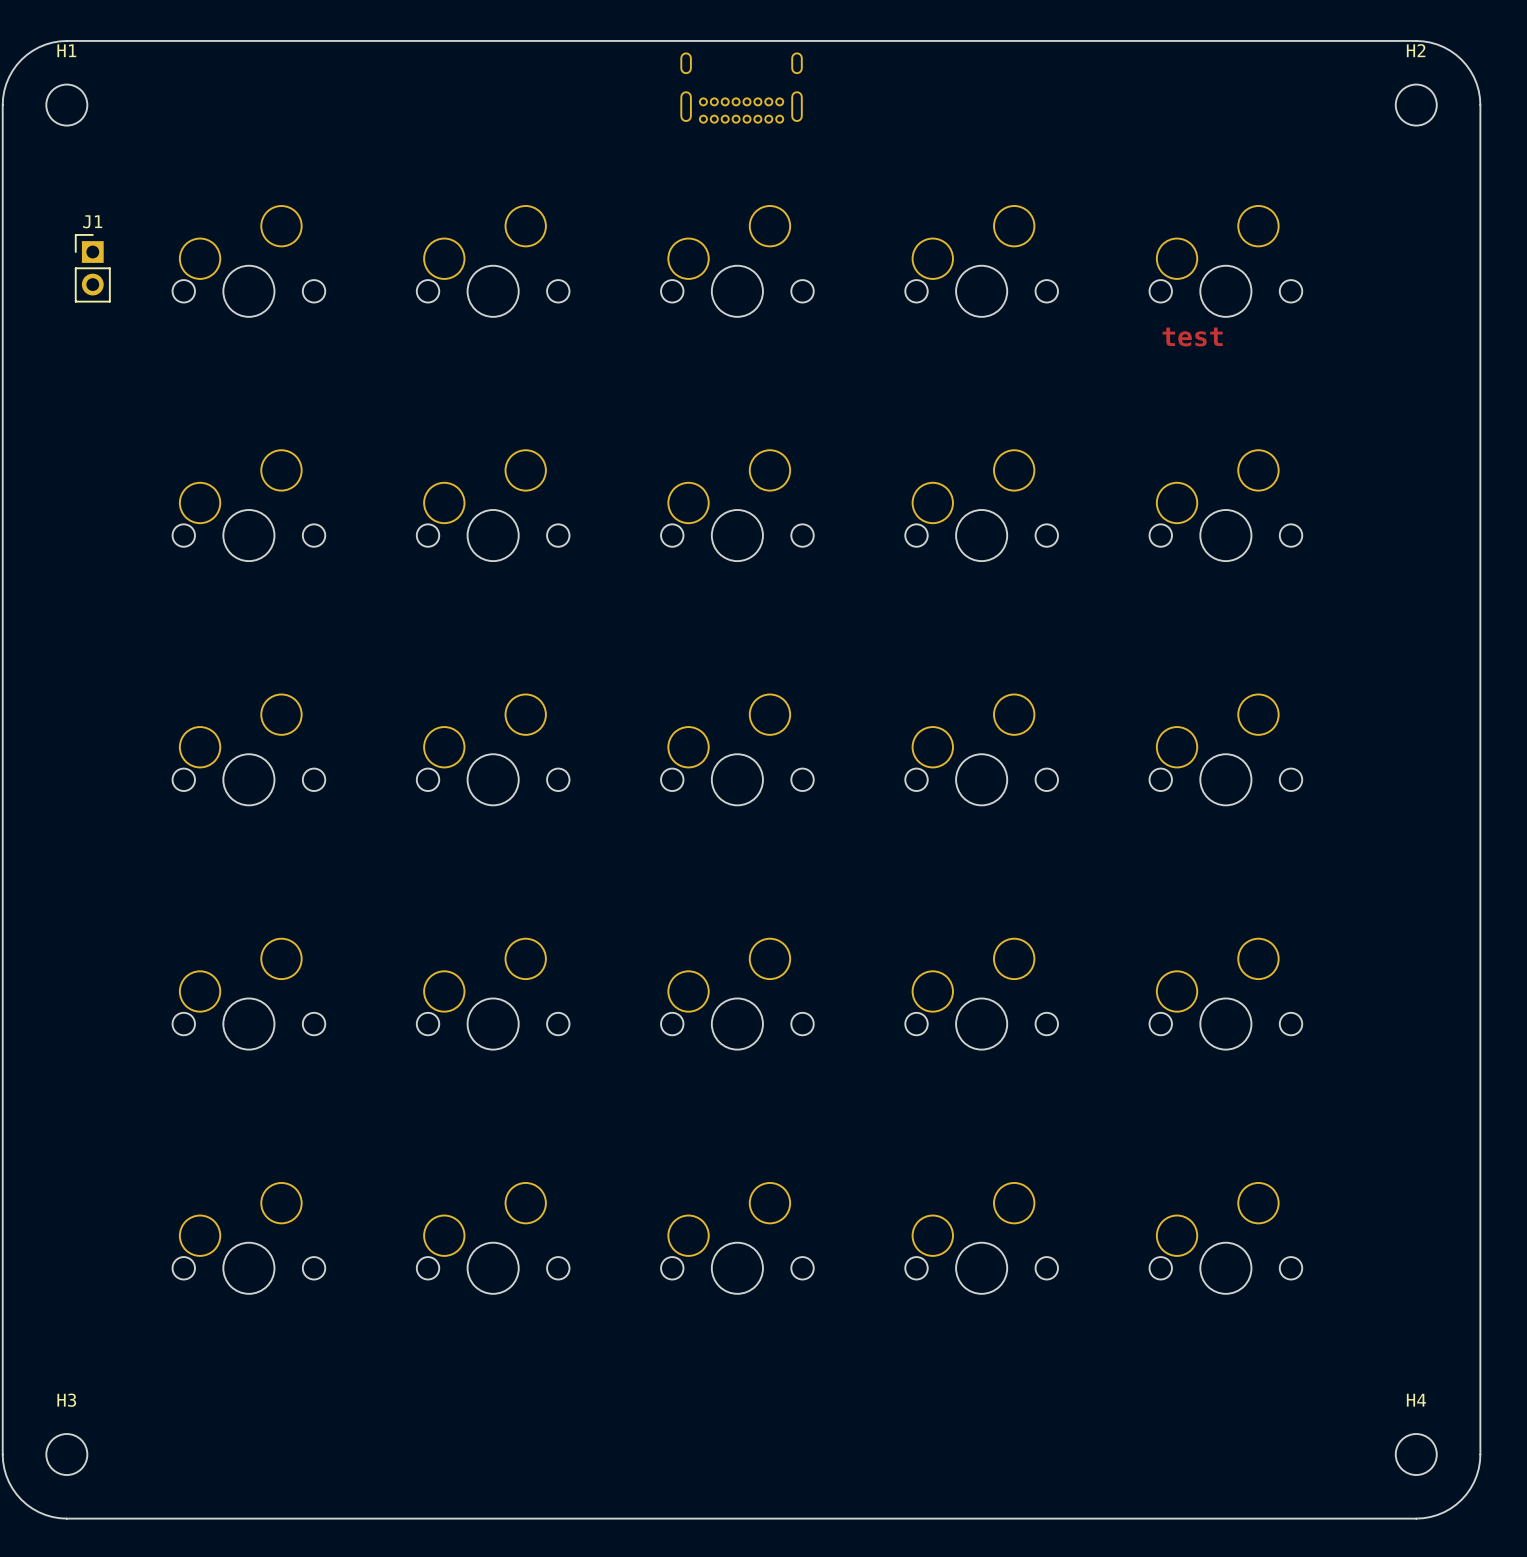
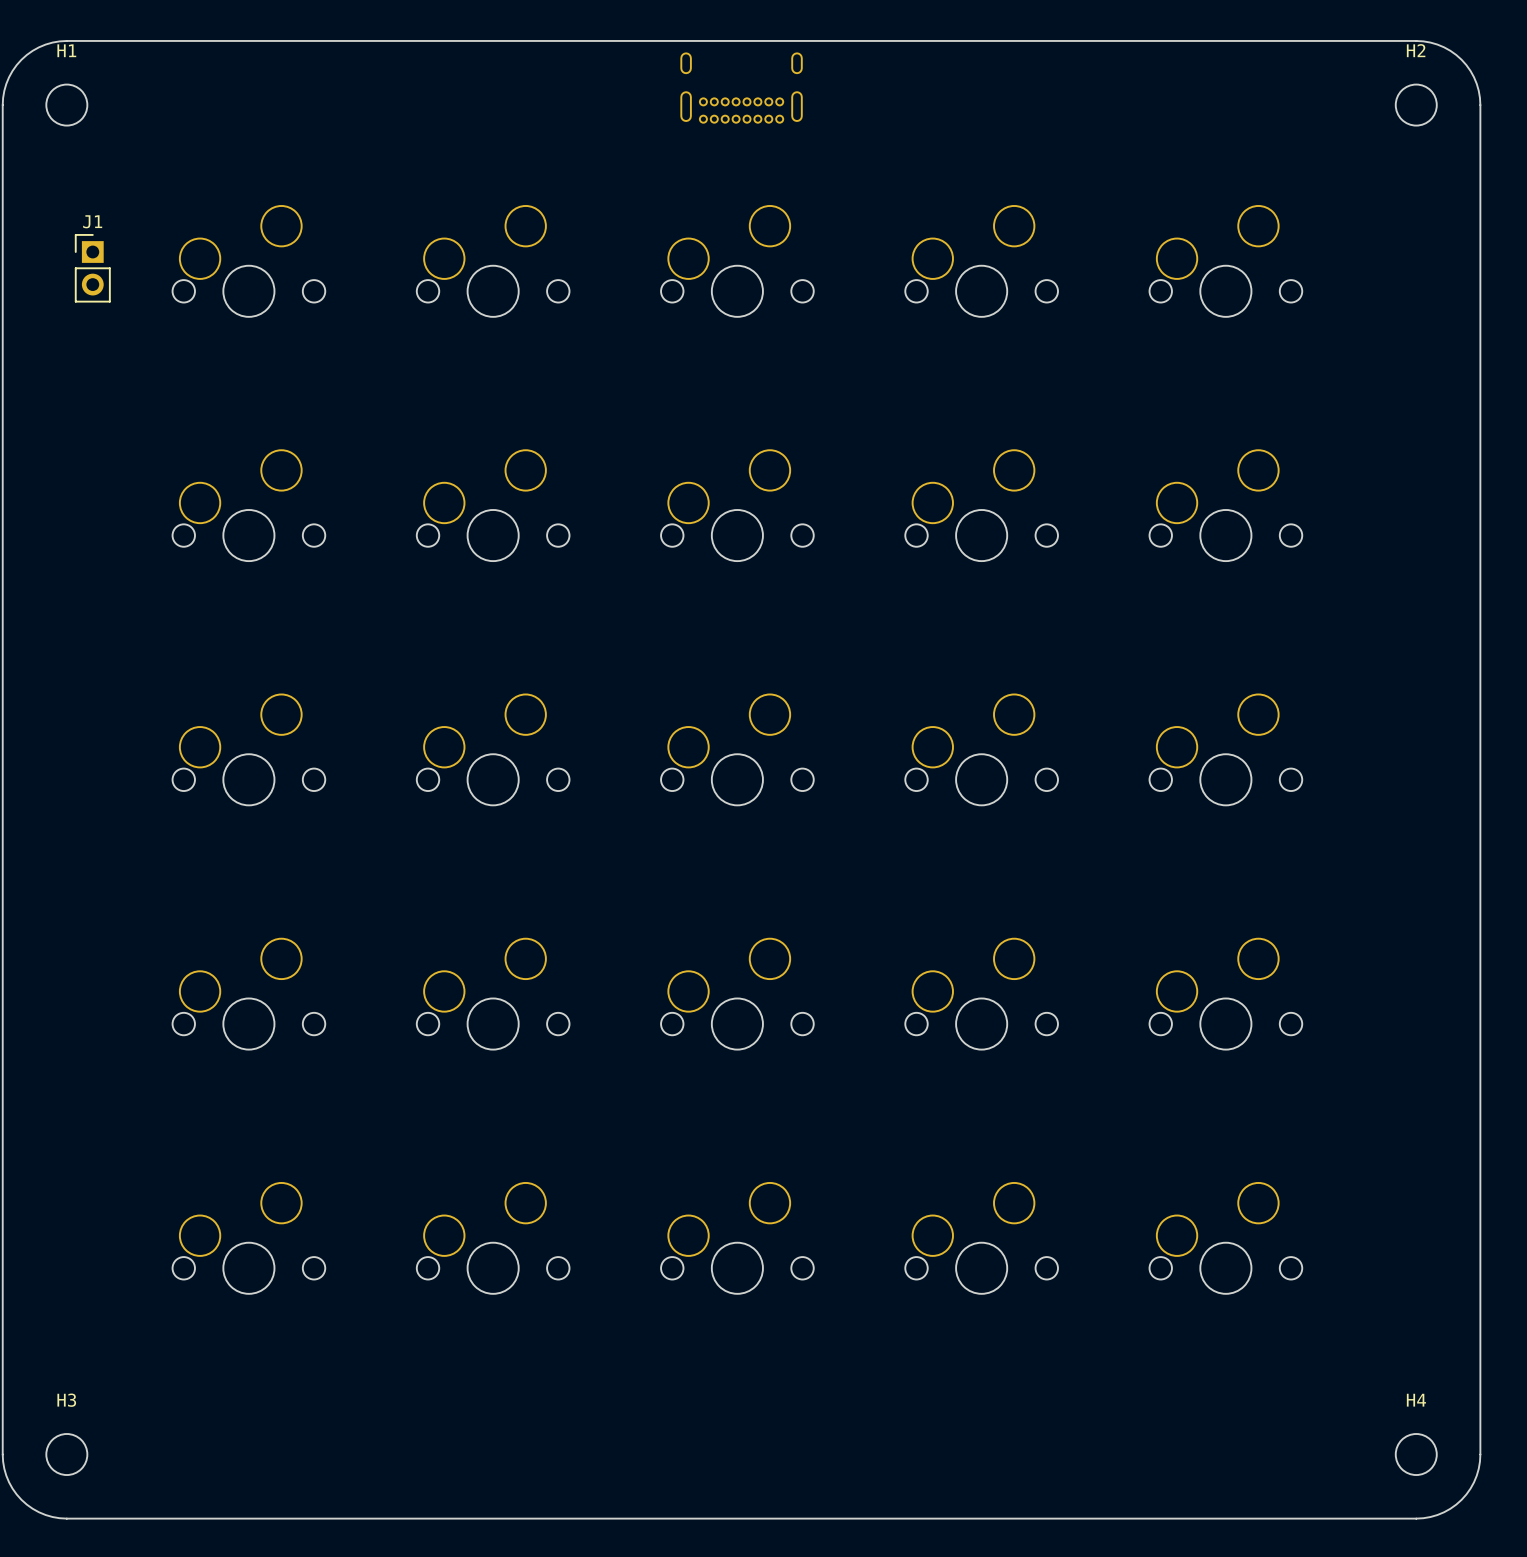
text: test (1192, 336) -> none

